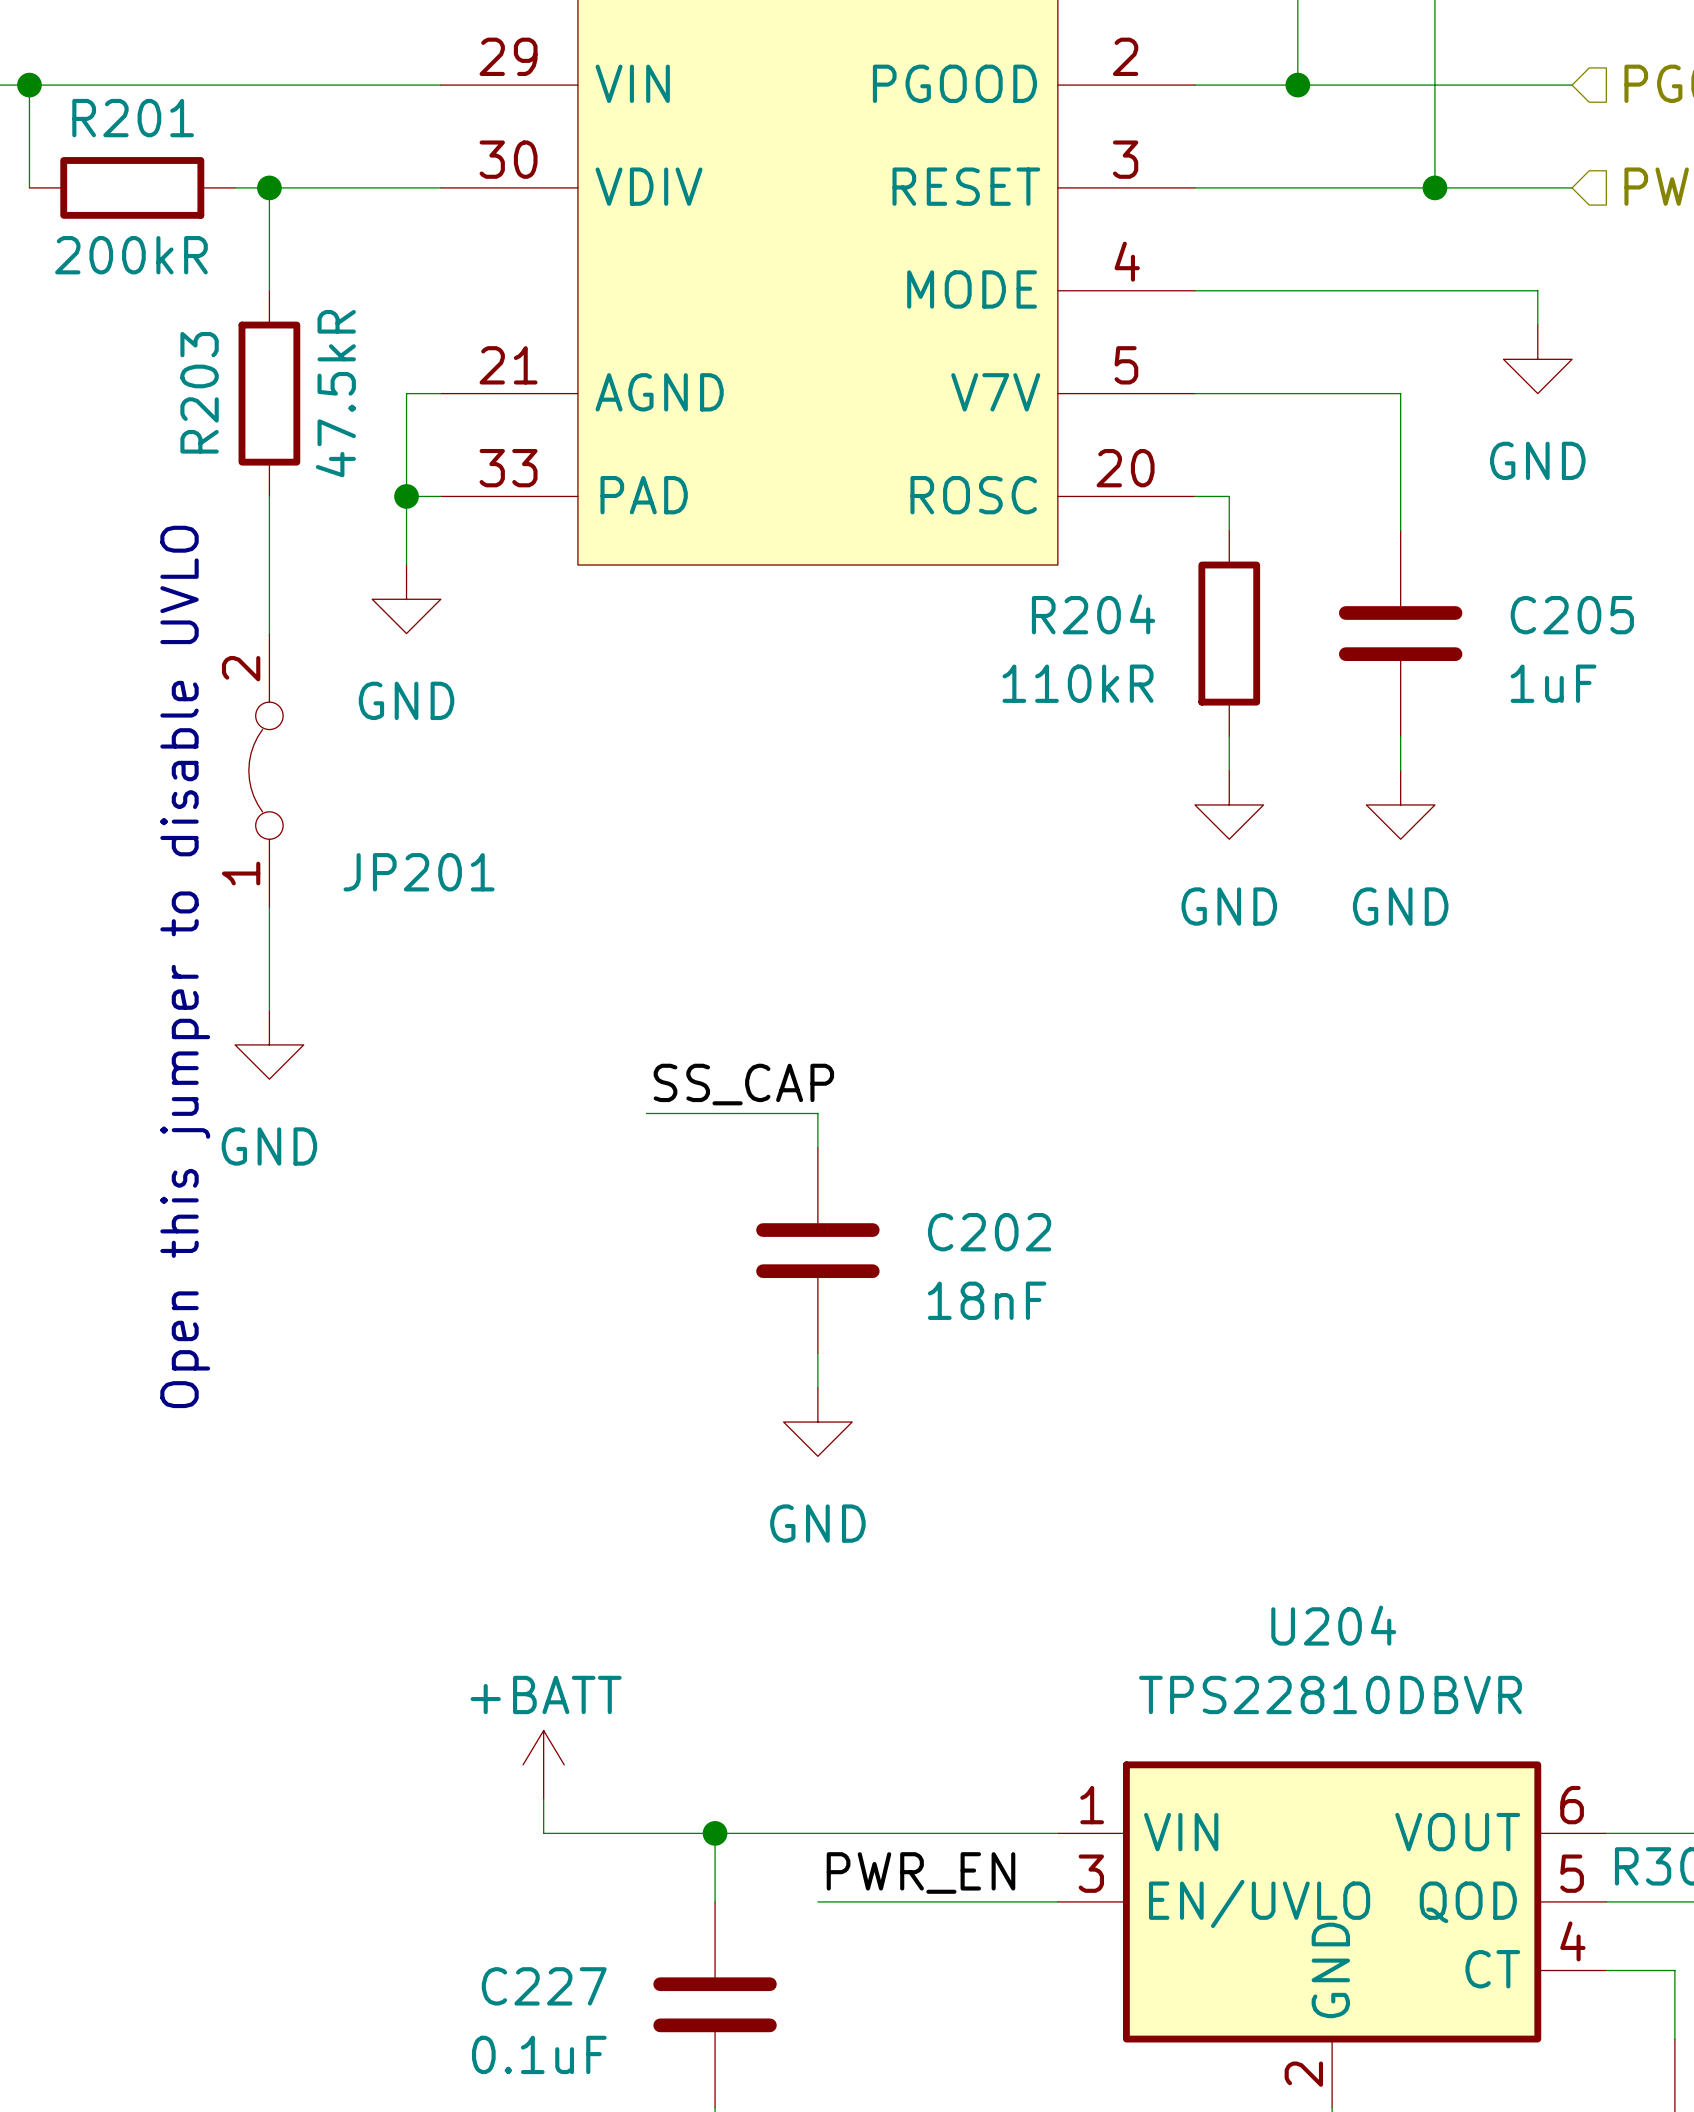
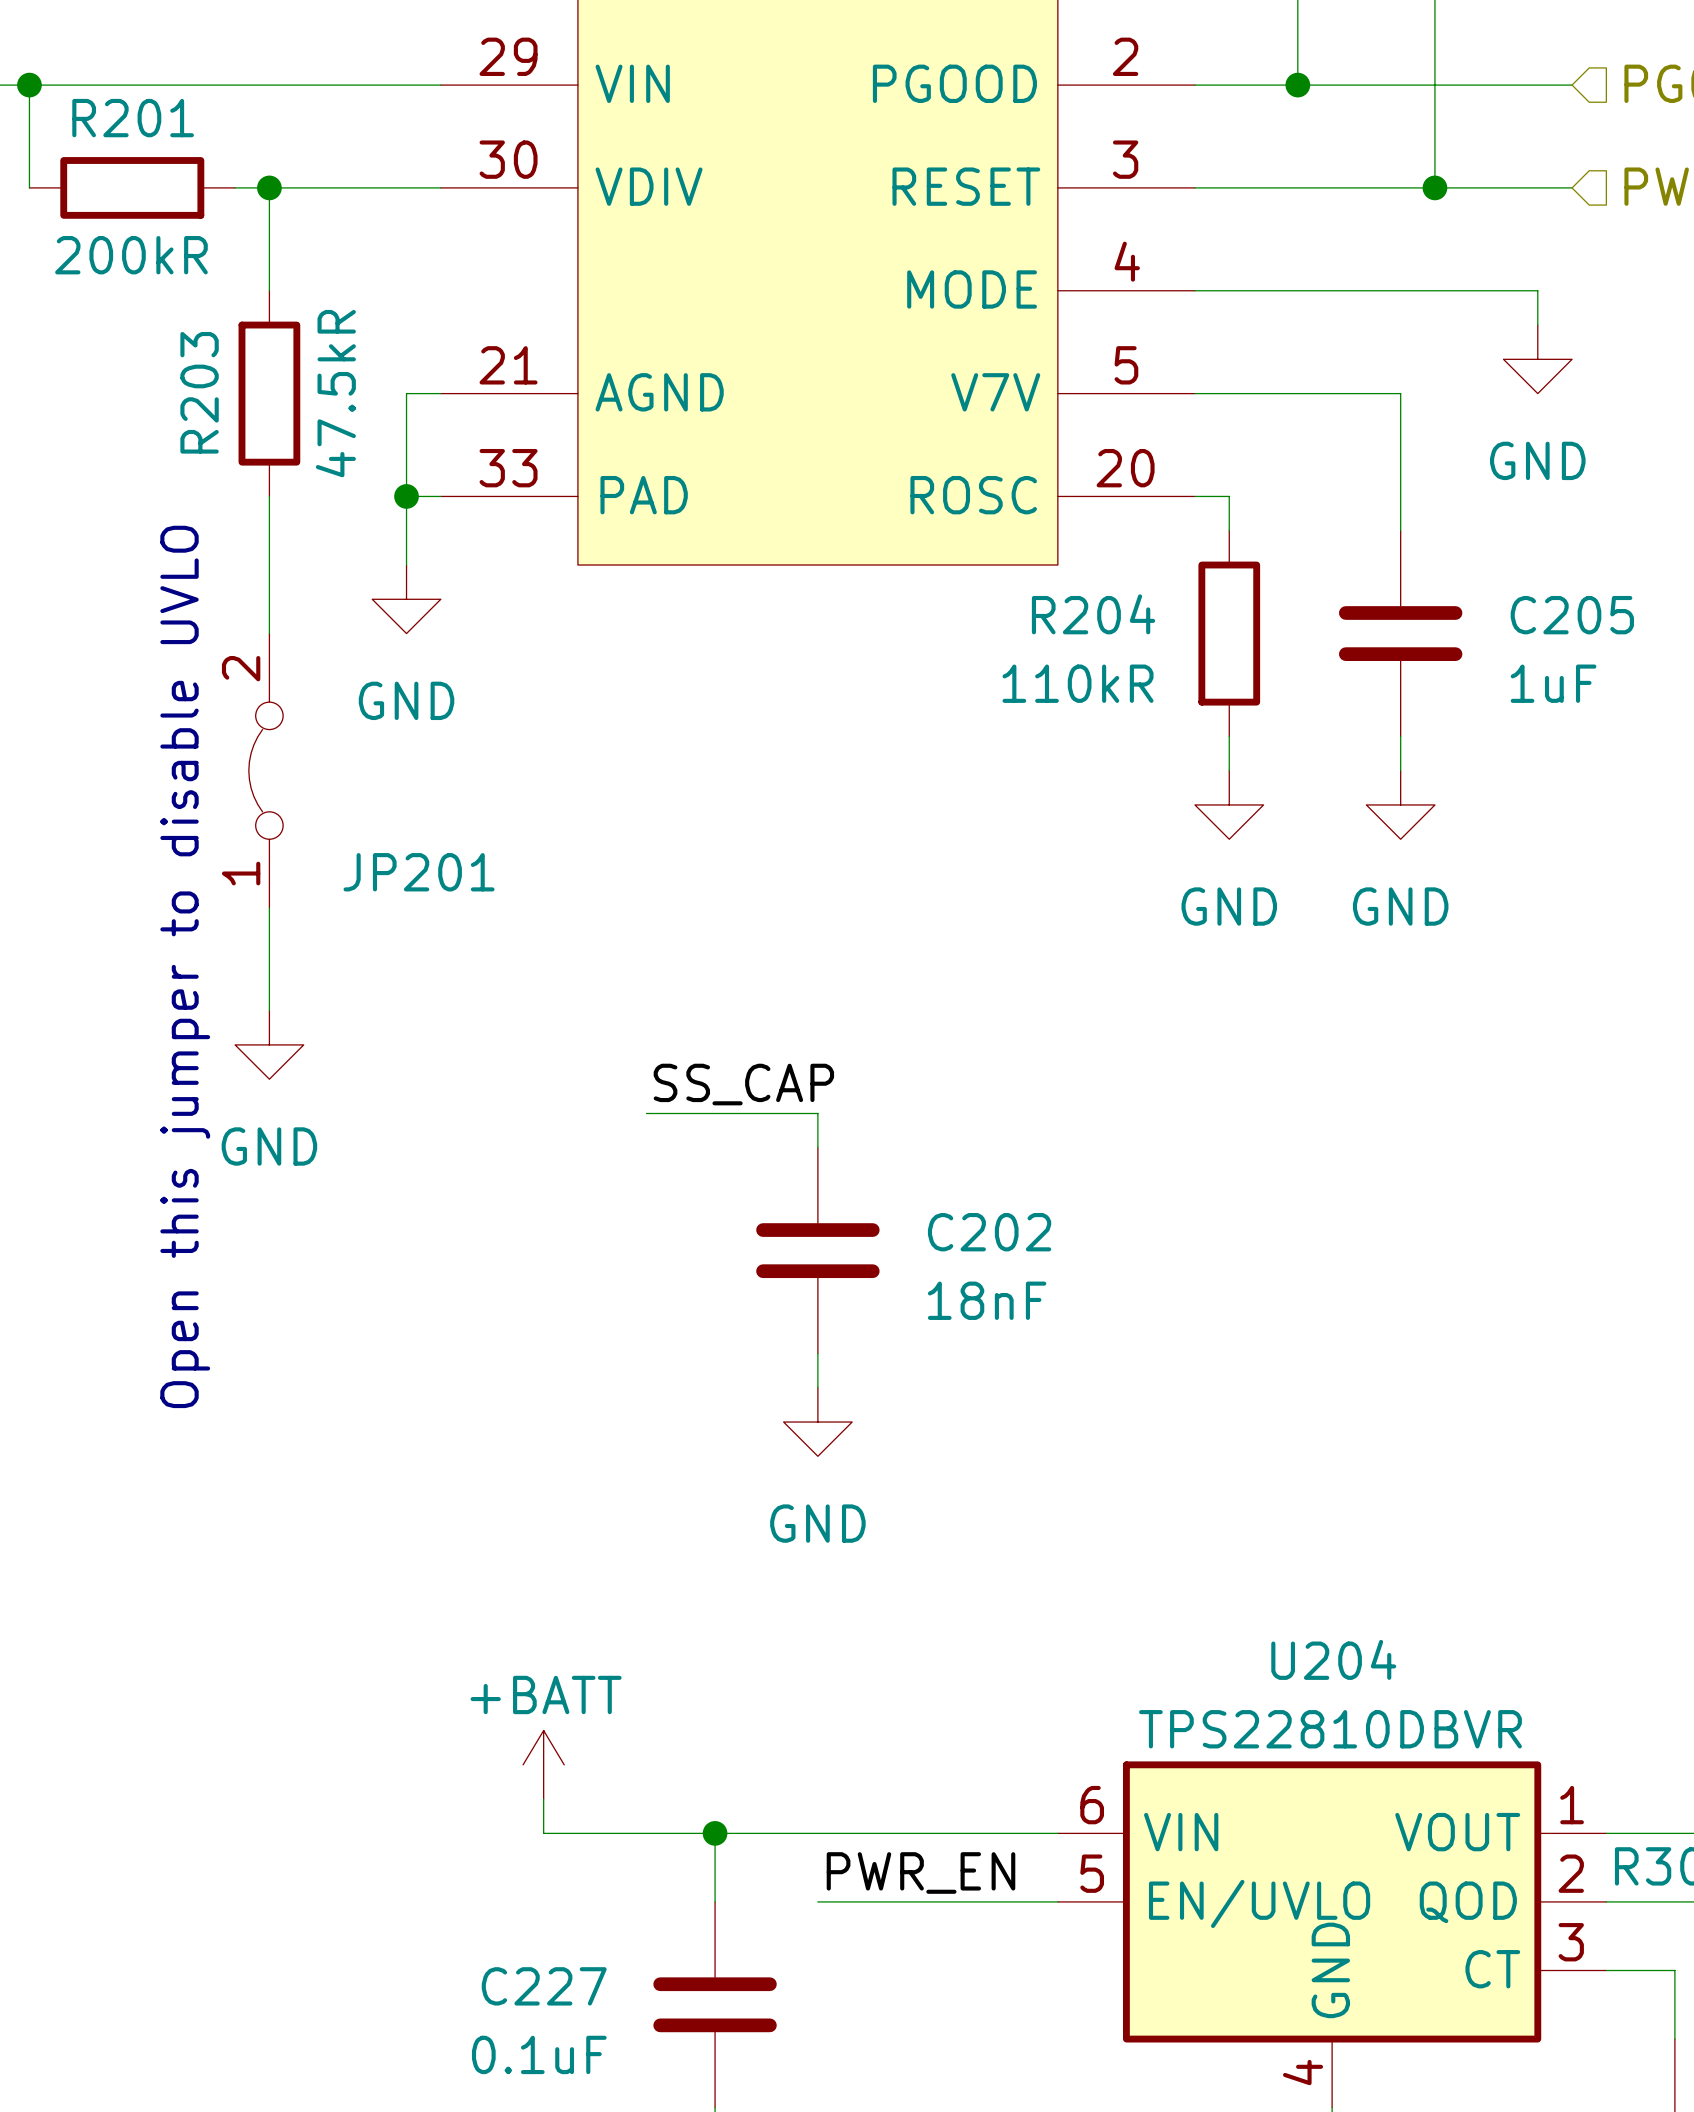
U204 name position: U204 (1333, 1625) -> U204 (1333, 1659)
U204 value position: TPS22810DBVR (1330, 1694) -> TPS22810DBVR (1330, 1729)
U204 pin number: 1 (1092, 1805) -> 6 (1092, 1805)
U204 pin number: 6 (1572, 1805) -> 1 (1572, 1805)
U204 pin number: 3 (1091, 1873) -> 5 (1092, 1873)
U204 pin number: 5 (1572, 1873) -> 2 (1571, 1873)
U204 pin number: 4 (1572, 1941) -> 3 (1571, 1942)
U204 pin number: 2 (1303, 2074) -> 4 (1303, 2072)

